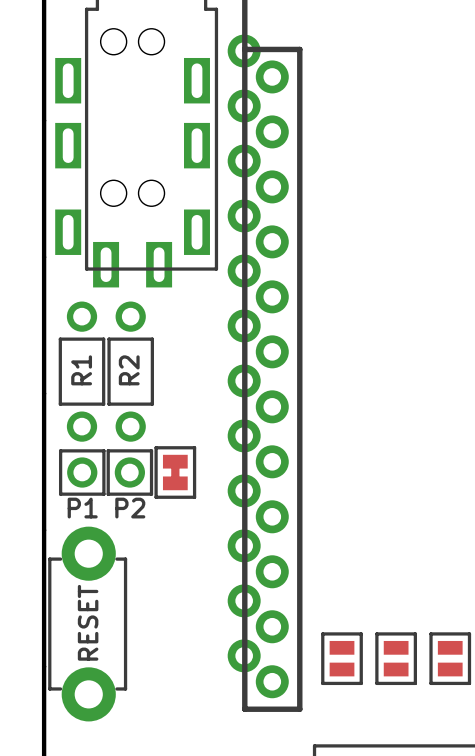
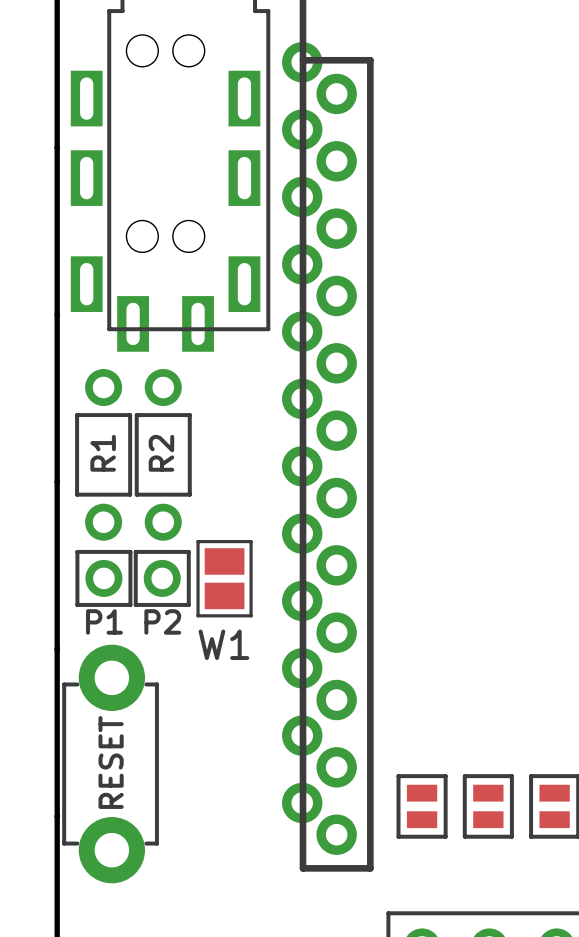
part: (175, 472) -> none
W1: none -> (224, 578)

